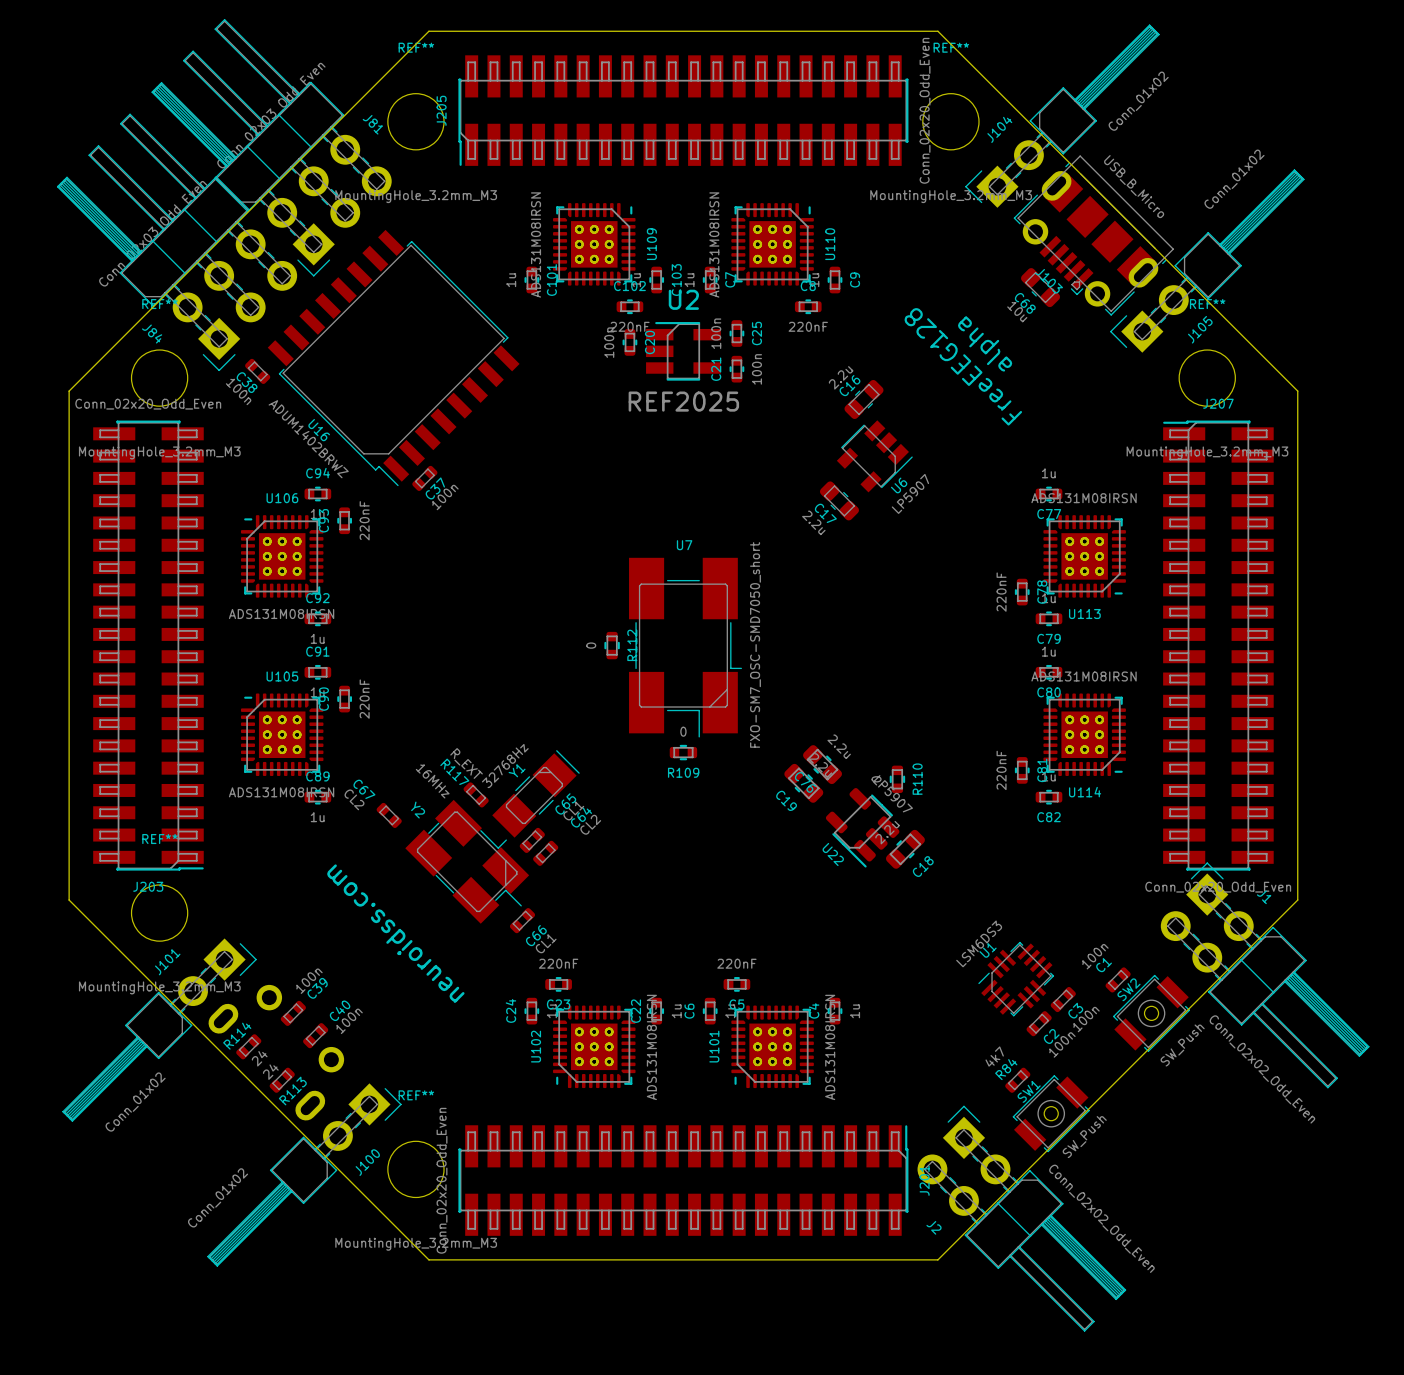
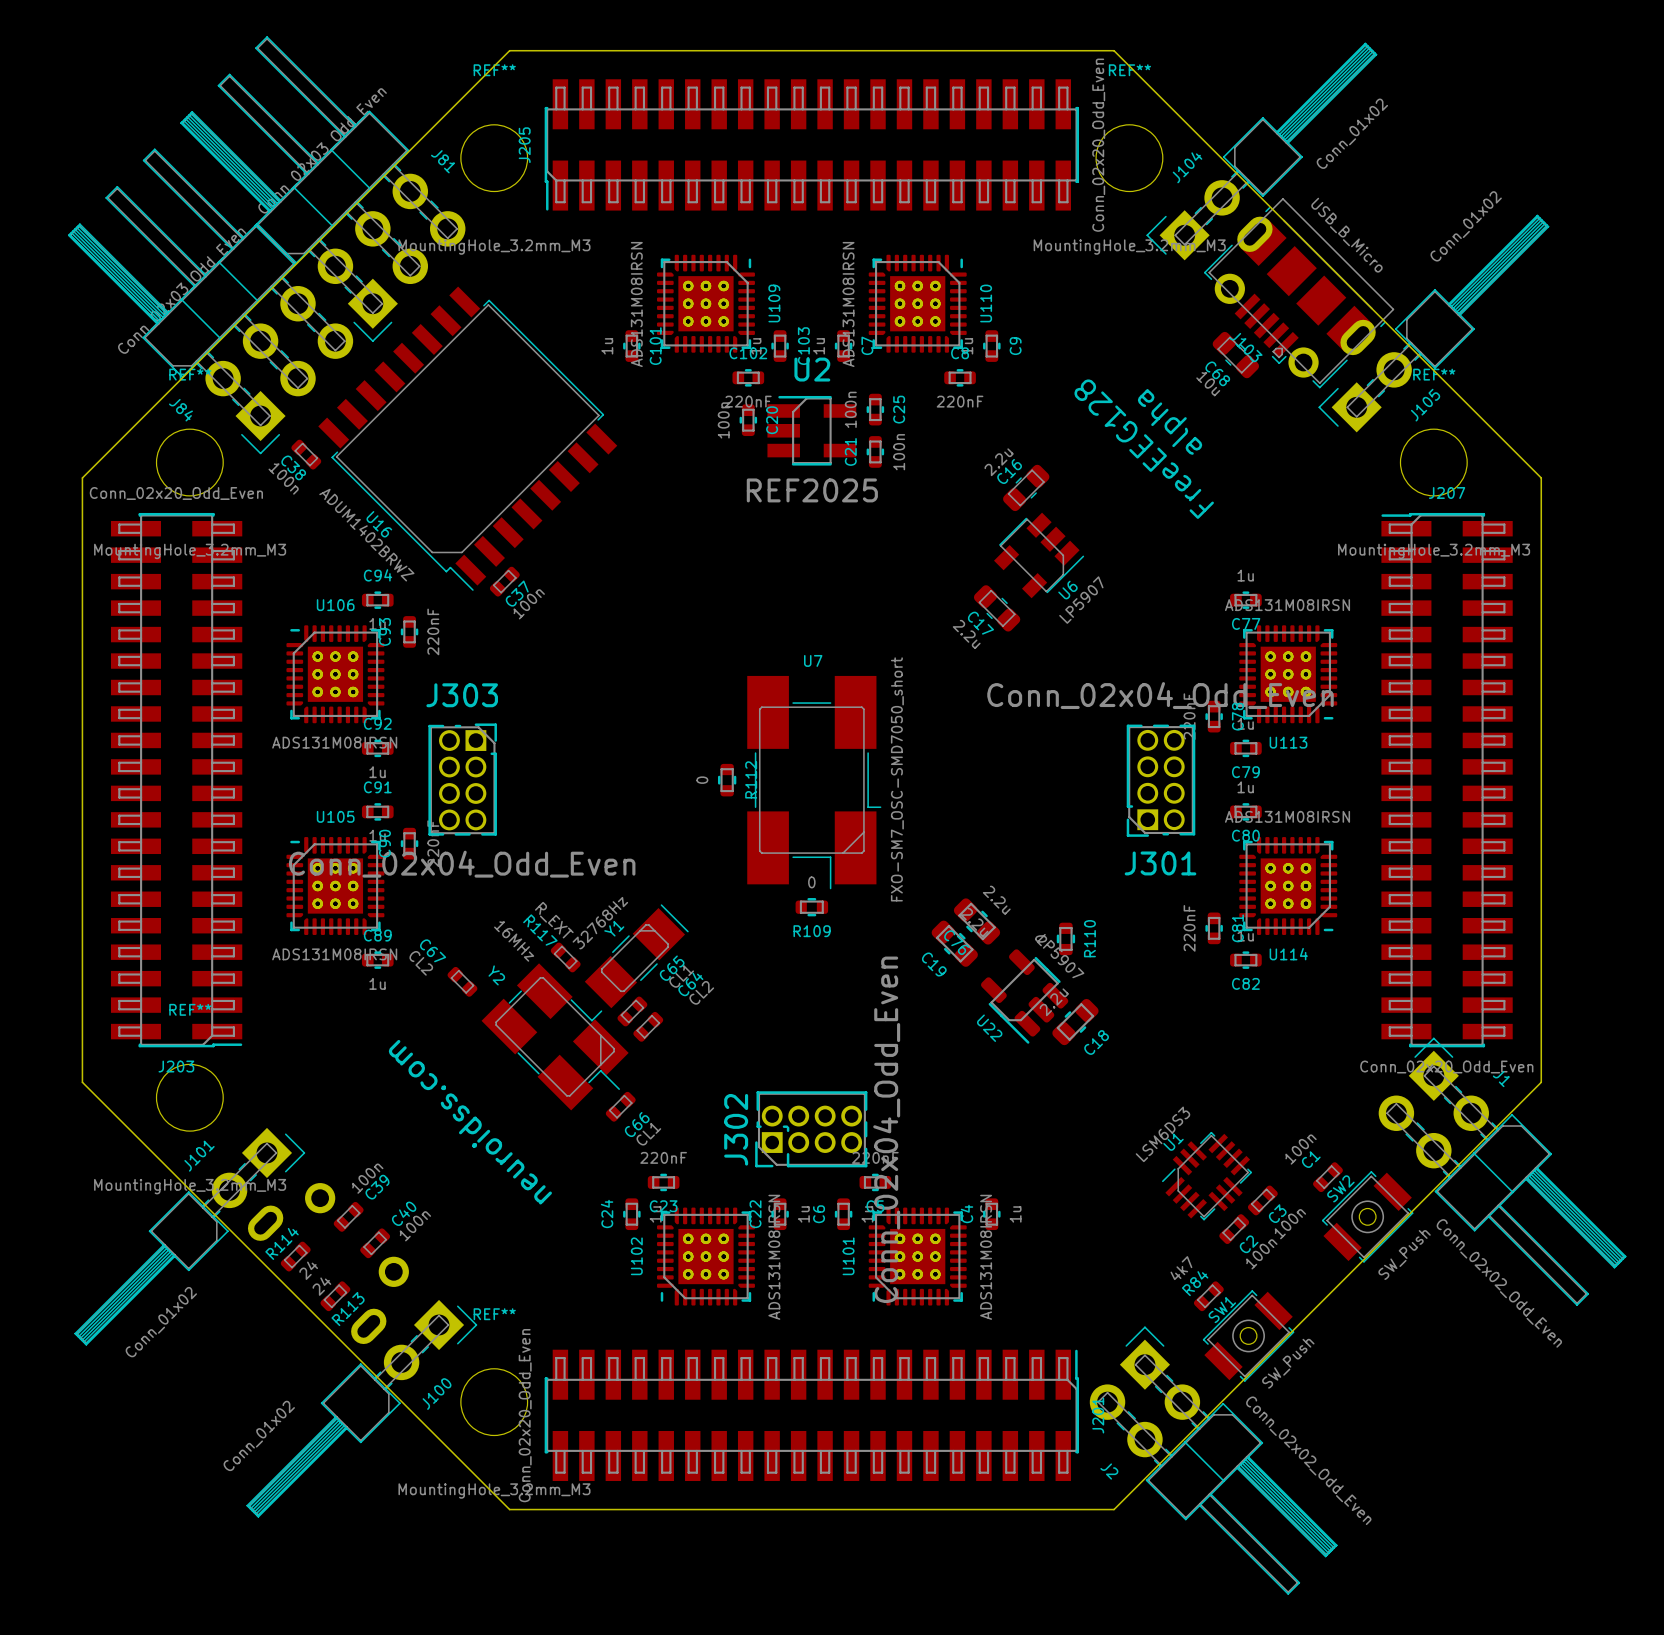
J303: none -> Conn_02x04_Odd_Even (462, 779)
J301: none -> Conn_02x04_Odd_Even (1161, 780)
J302: none -> Conn_02x04_Odd_Even (811, 1129)

